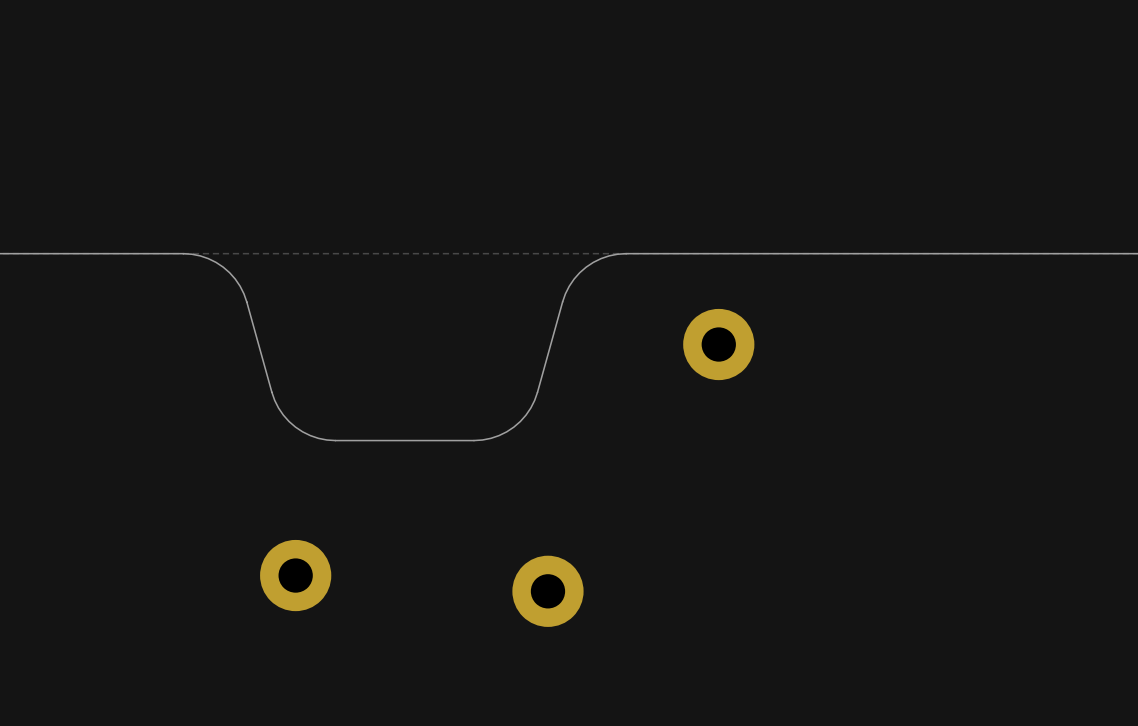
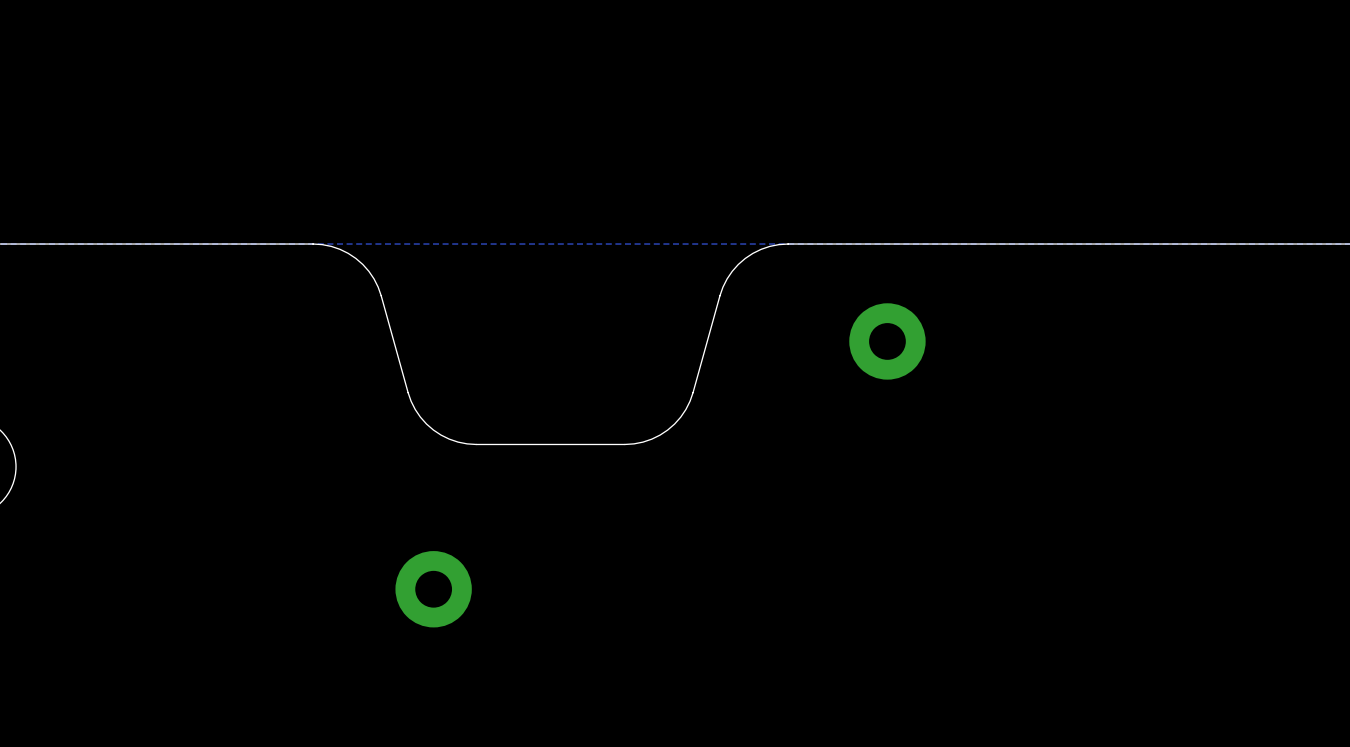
via: (547, 591) -> none

